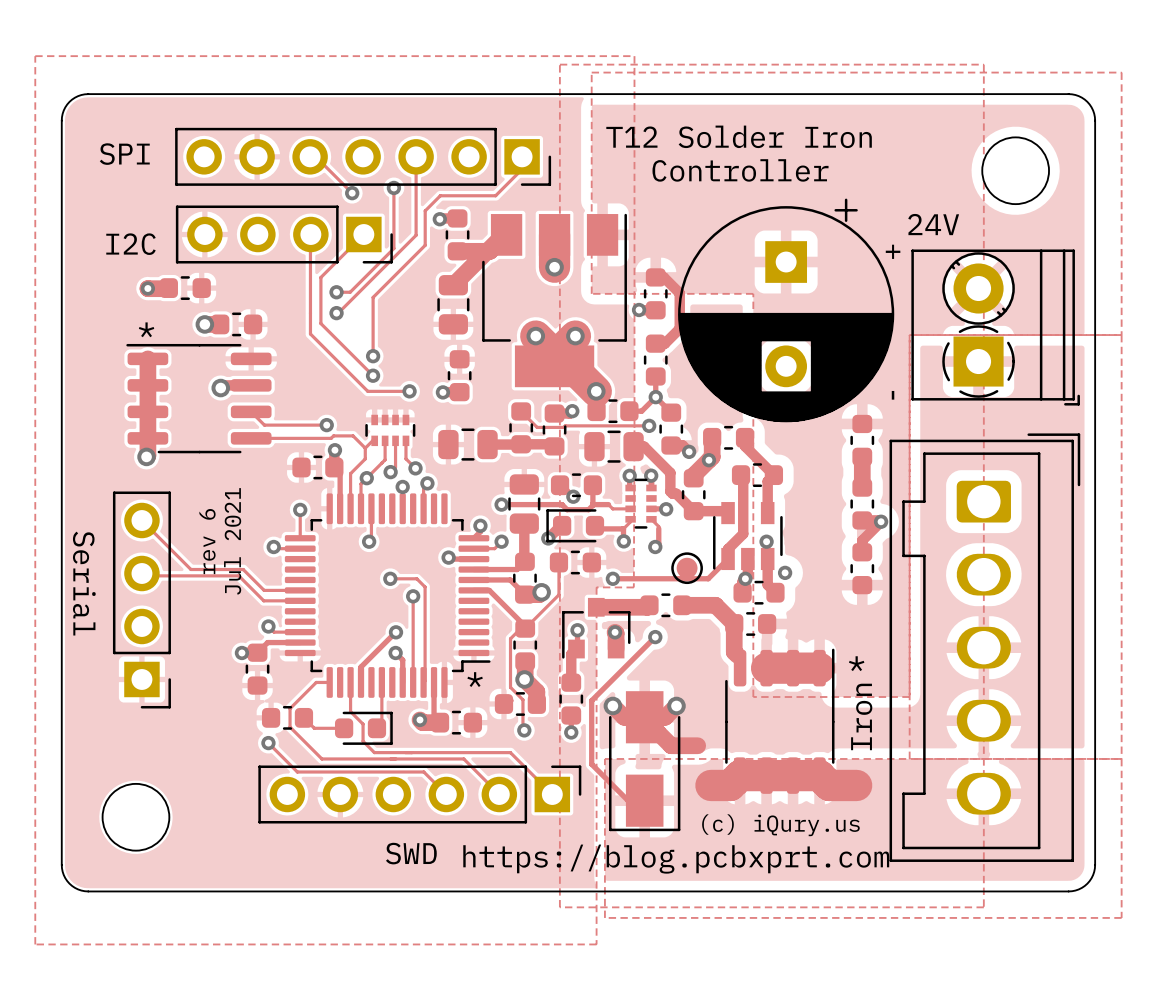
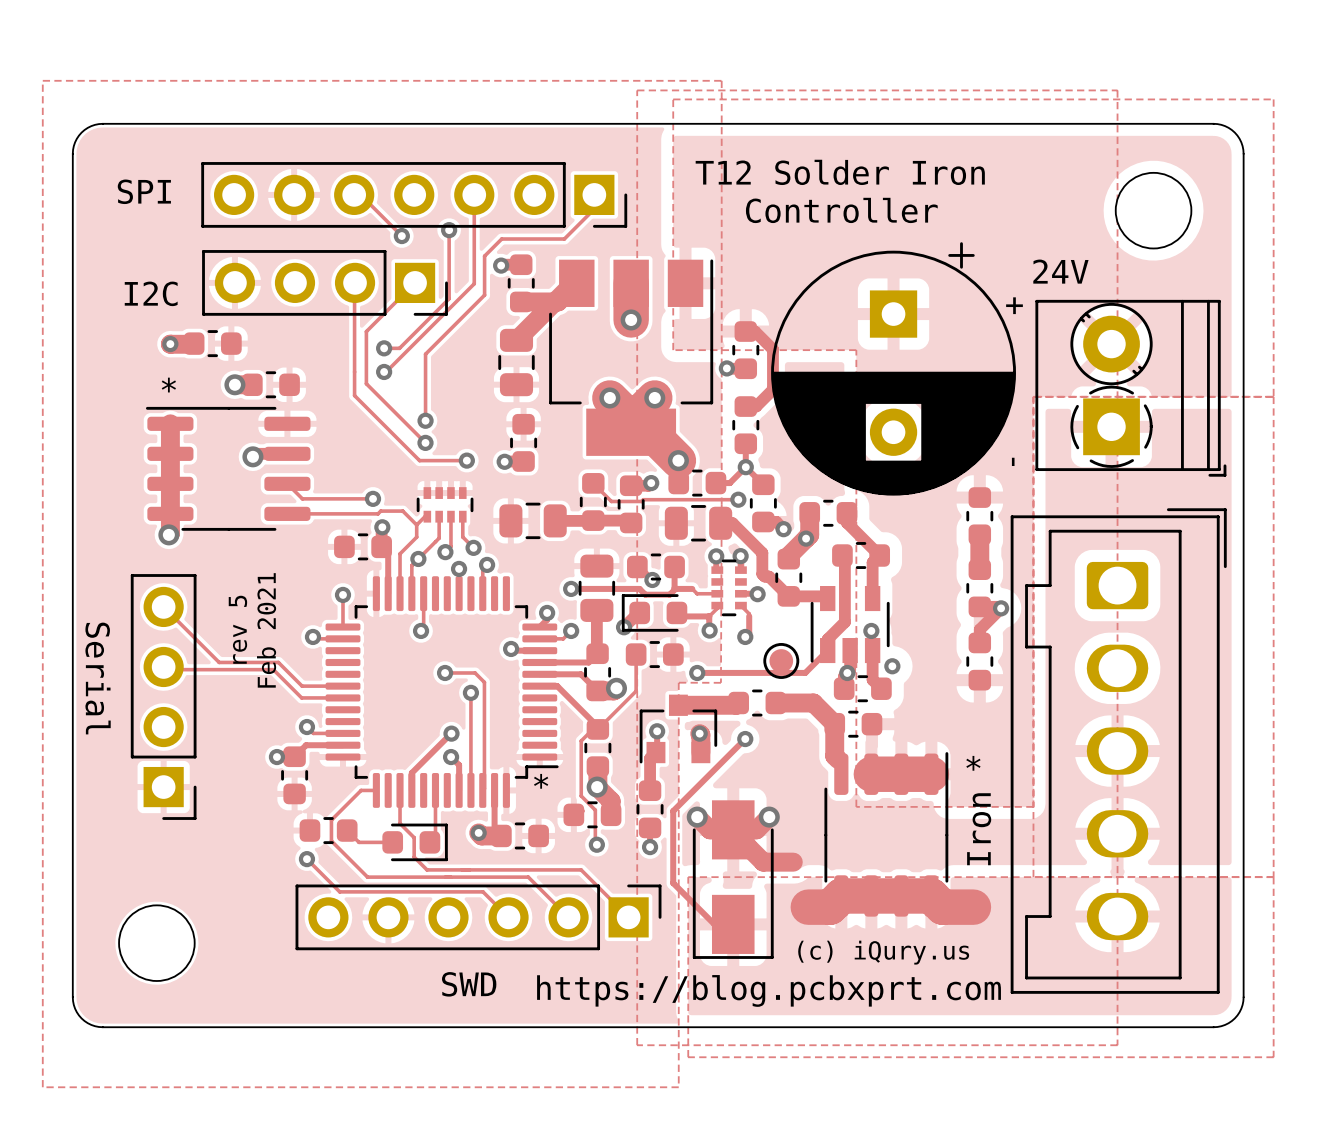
text: rev 6 (207, 541) -> rev 5 (237, 629)
text: Jul 2021 (232, 541) -> Feb 2021 (266, 630)

